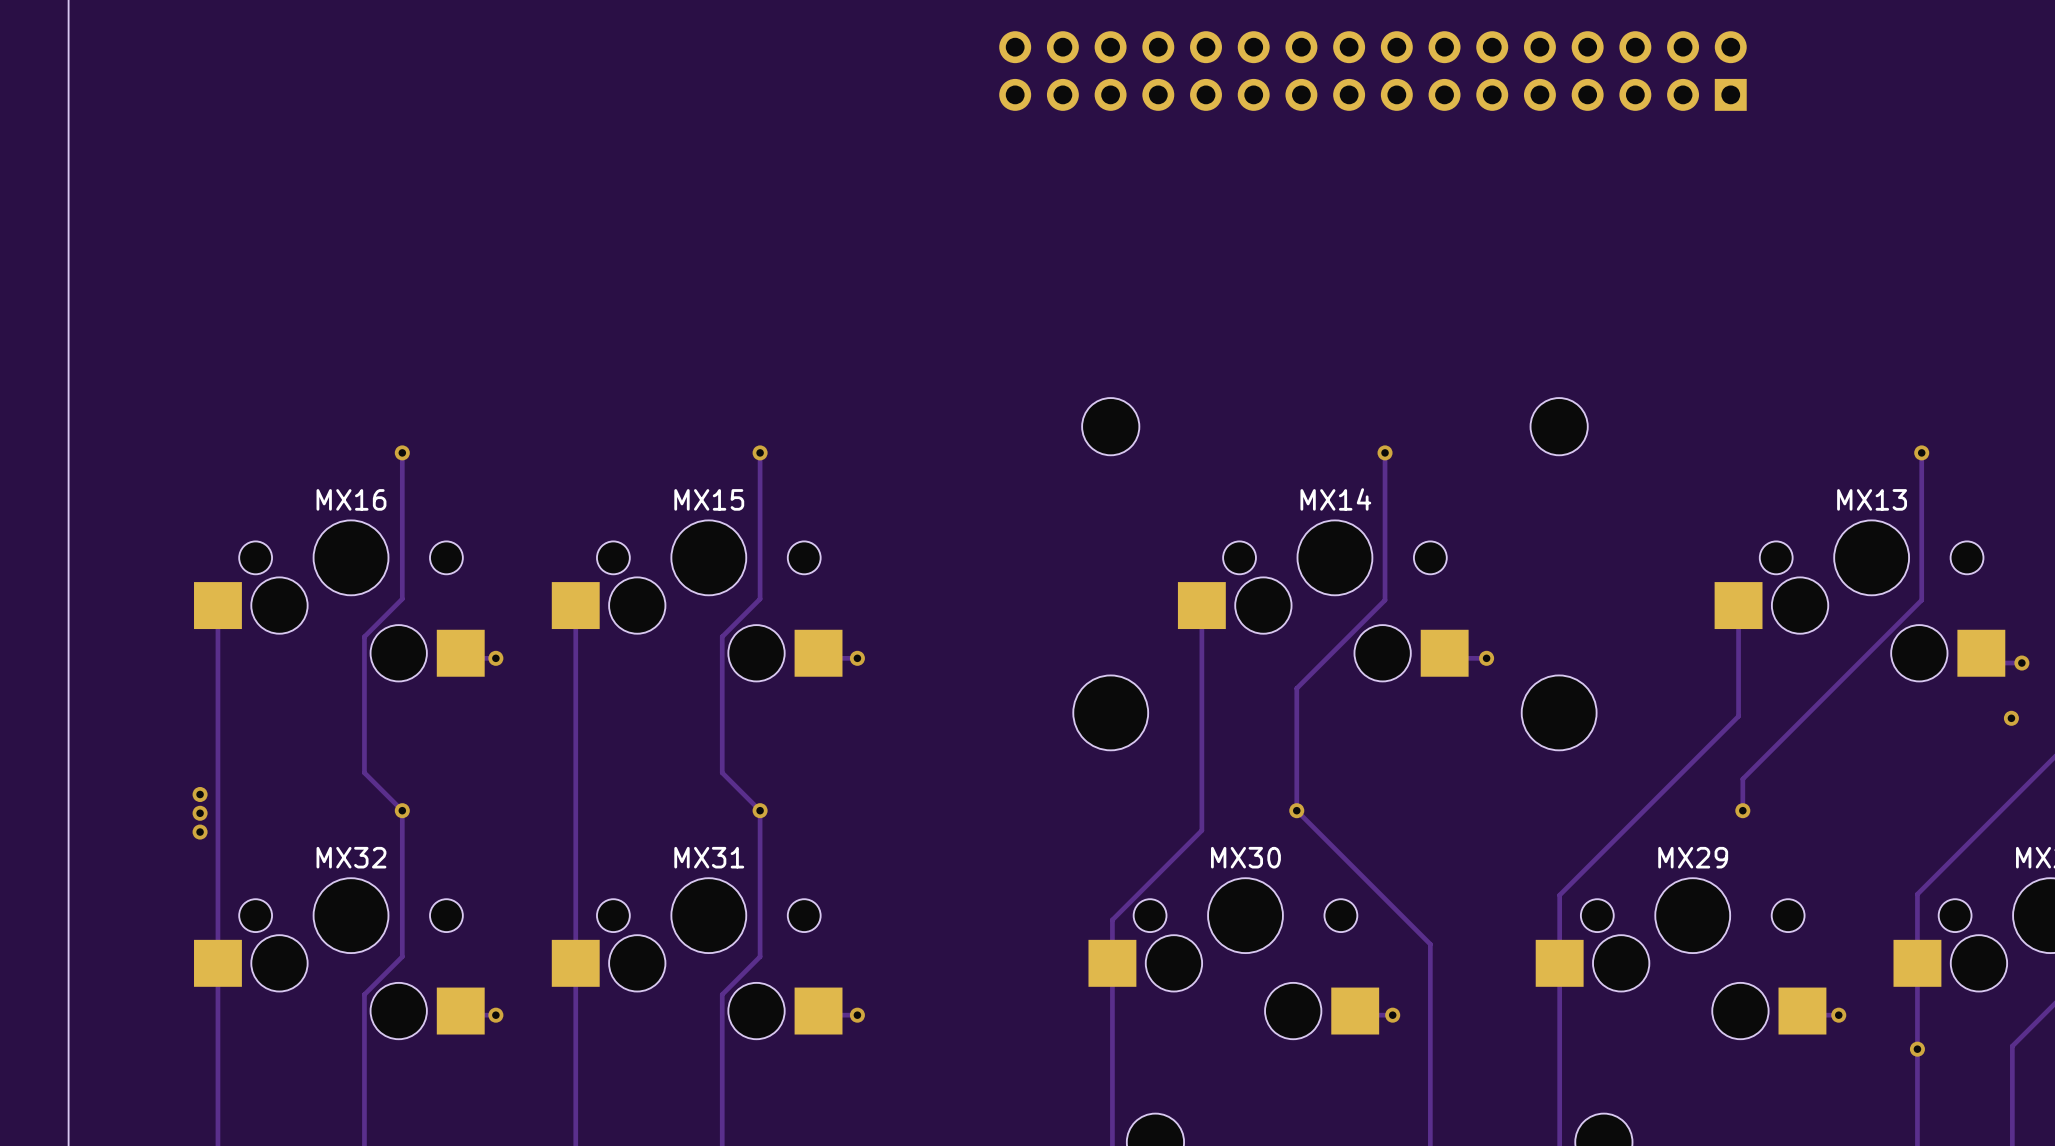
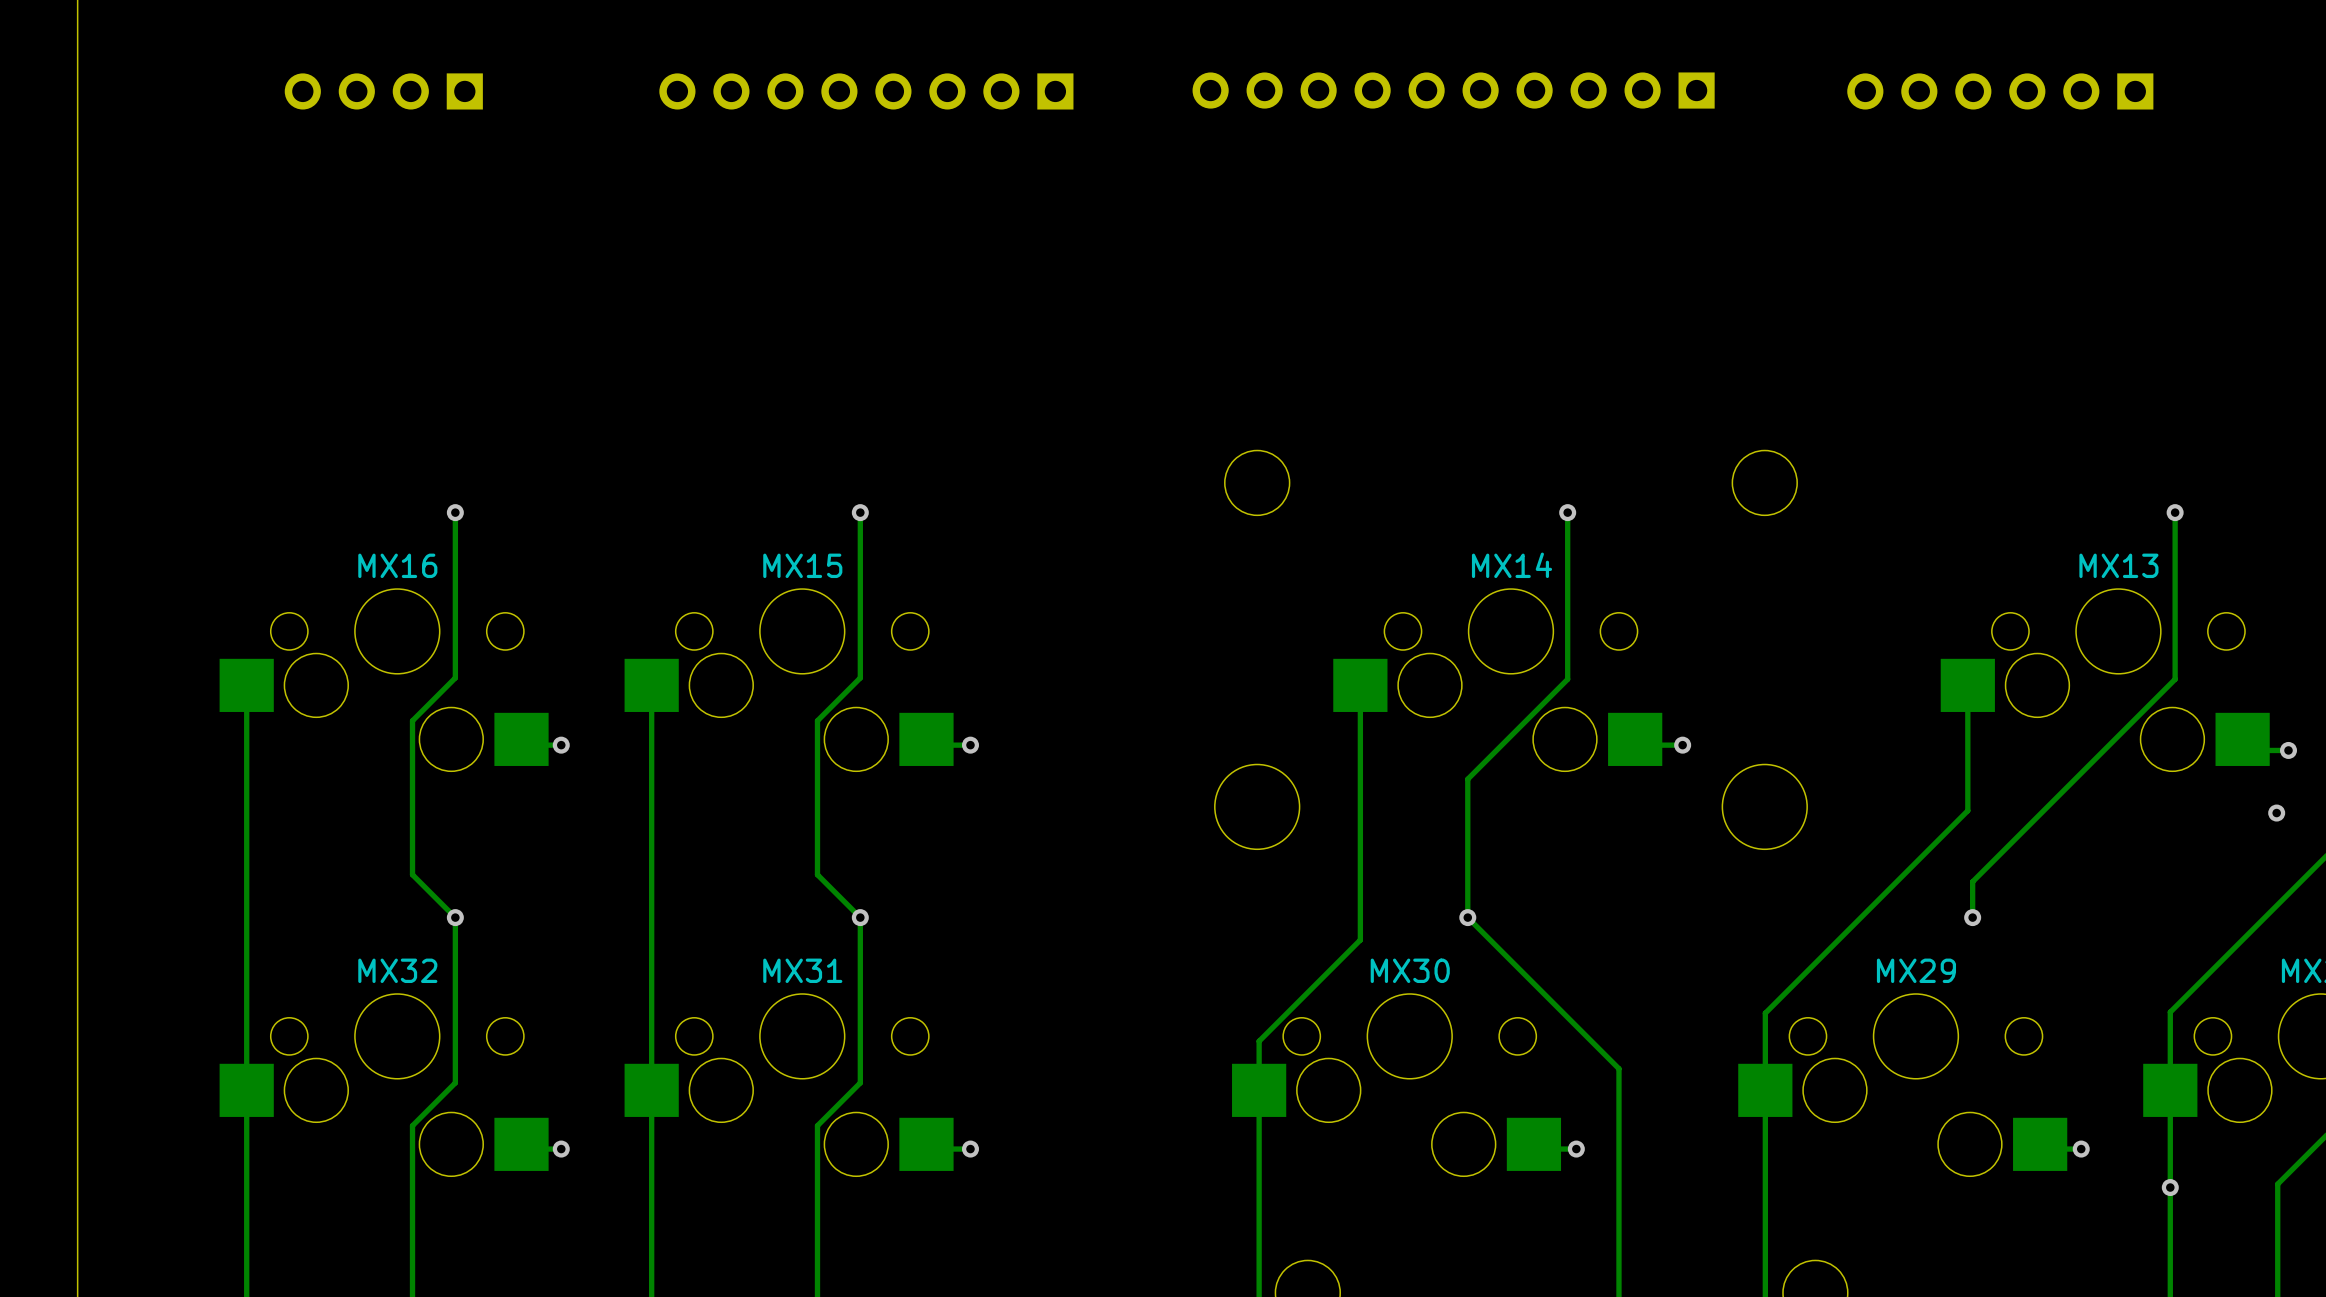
part: (1372, 71) -> none
part: none -> (1453, 90)
part: none -> (383, 91)
part: none -> (866, 91)
part: none -> (2000, 91)
via: (200, 794) -> none
via: (200, 813) -> none
via: (200, 832) -> none

